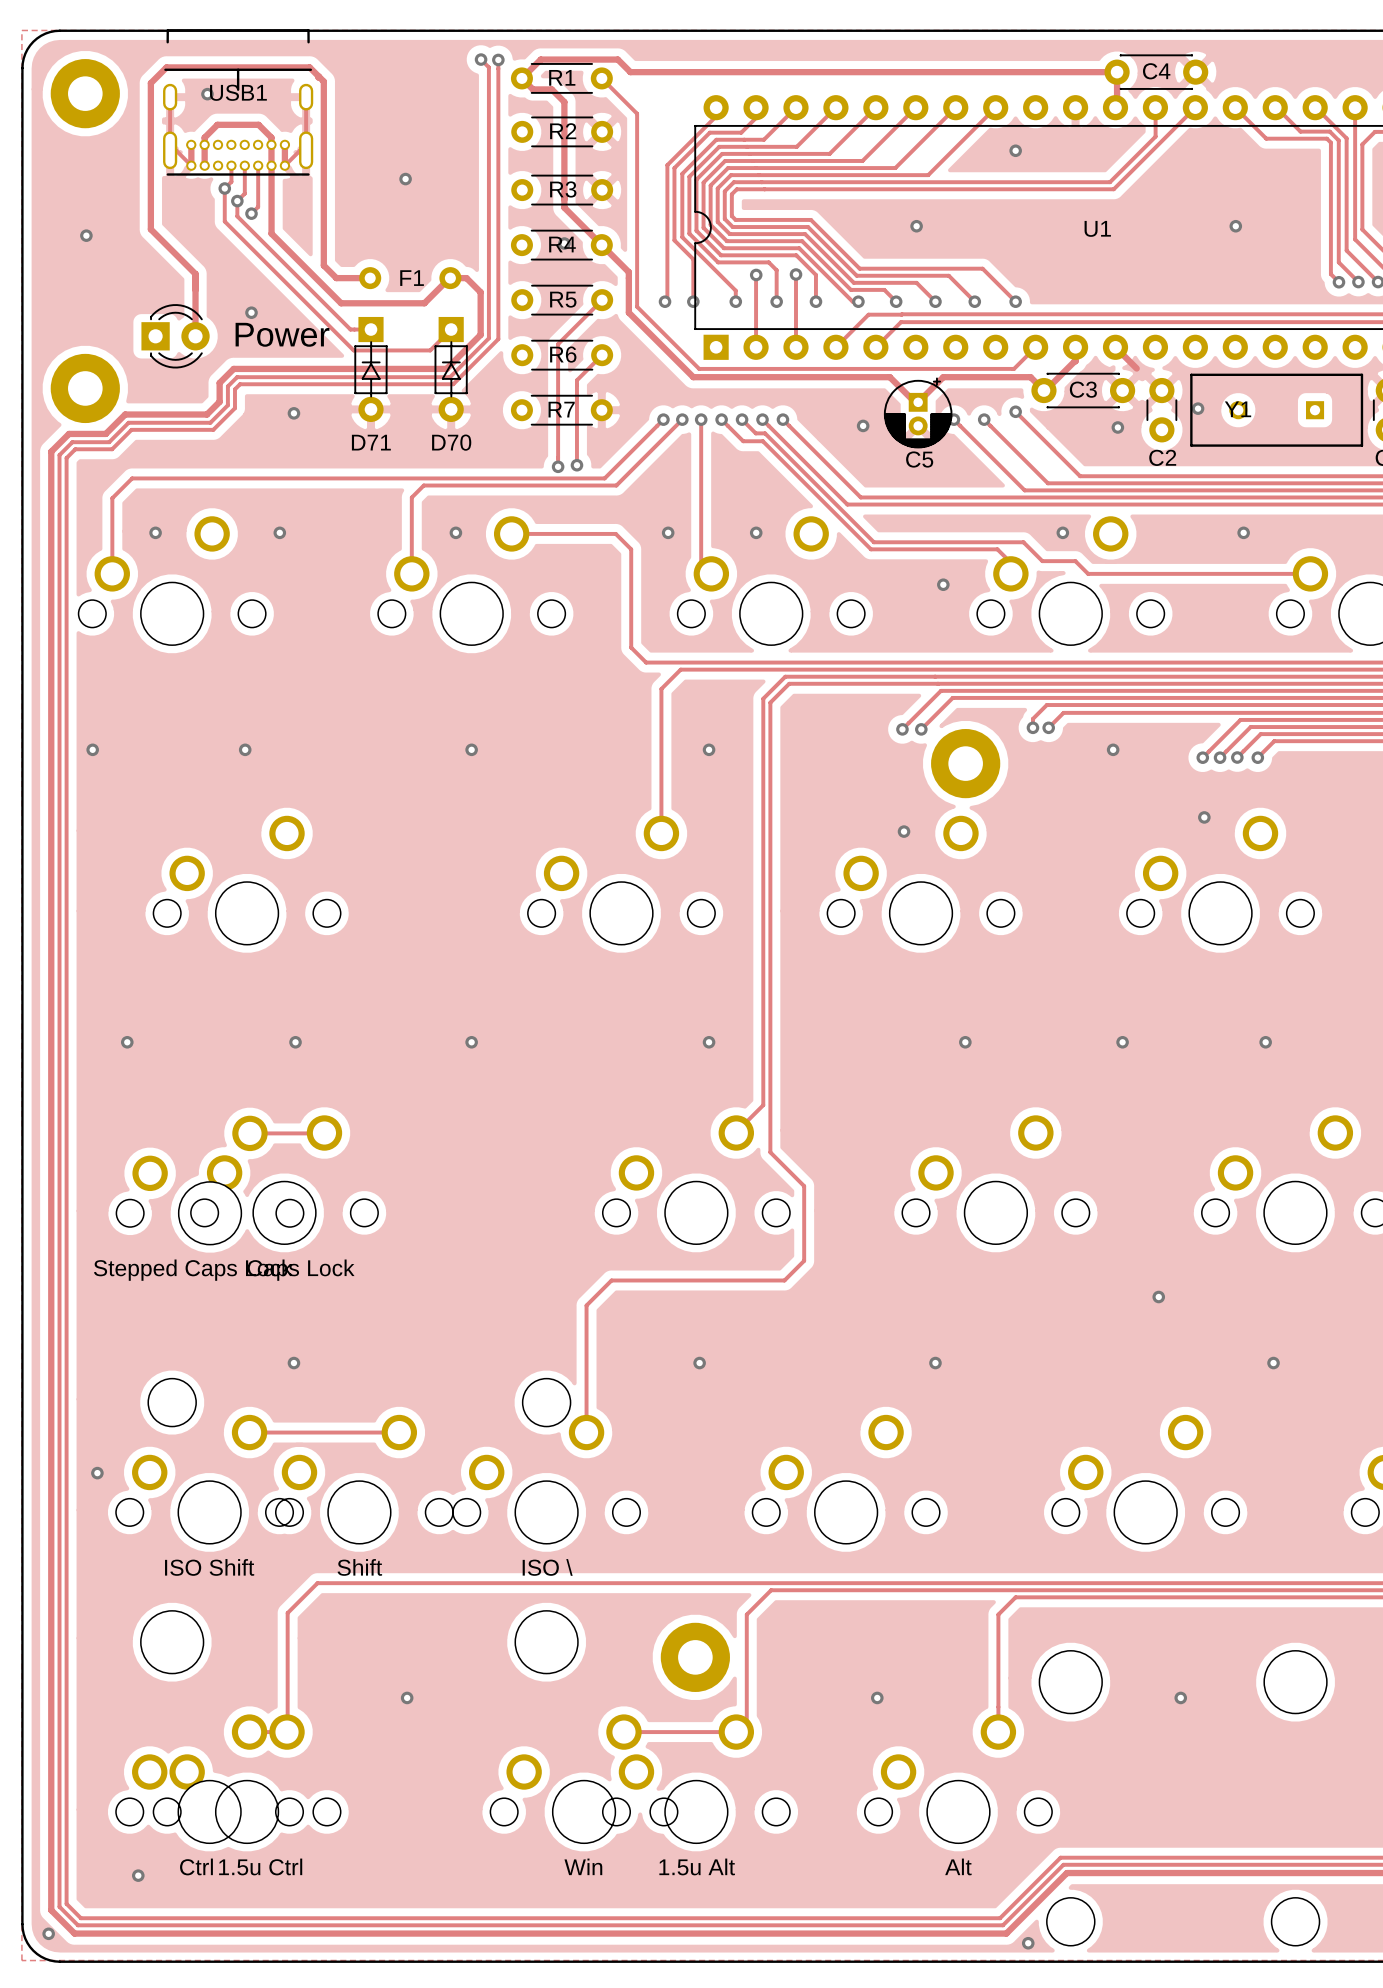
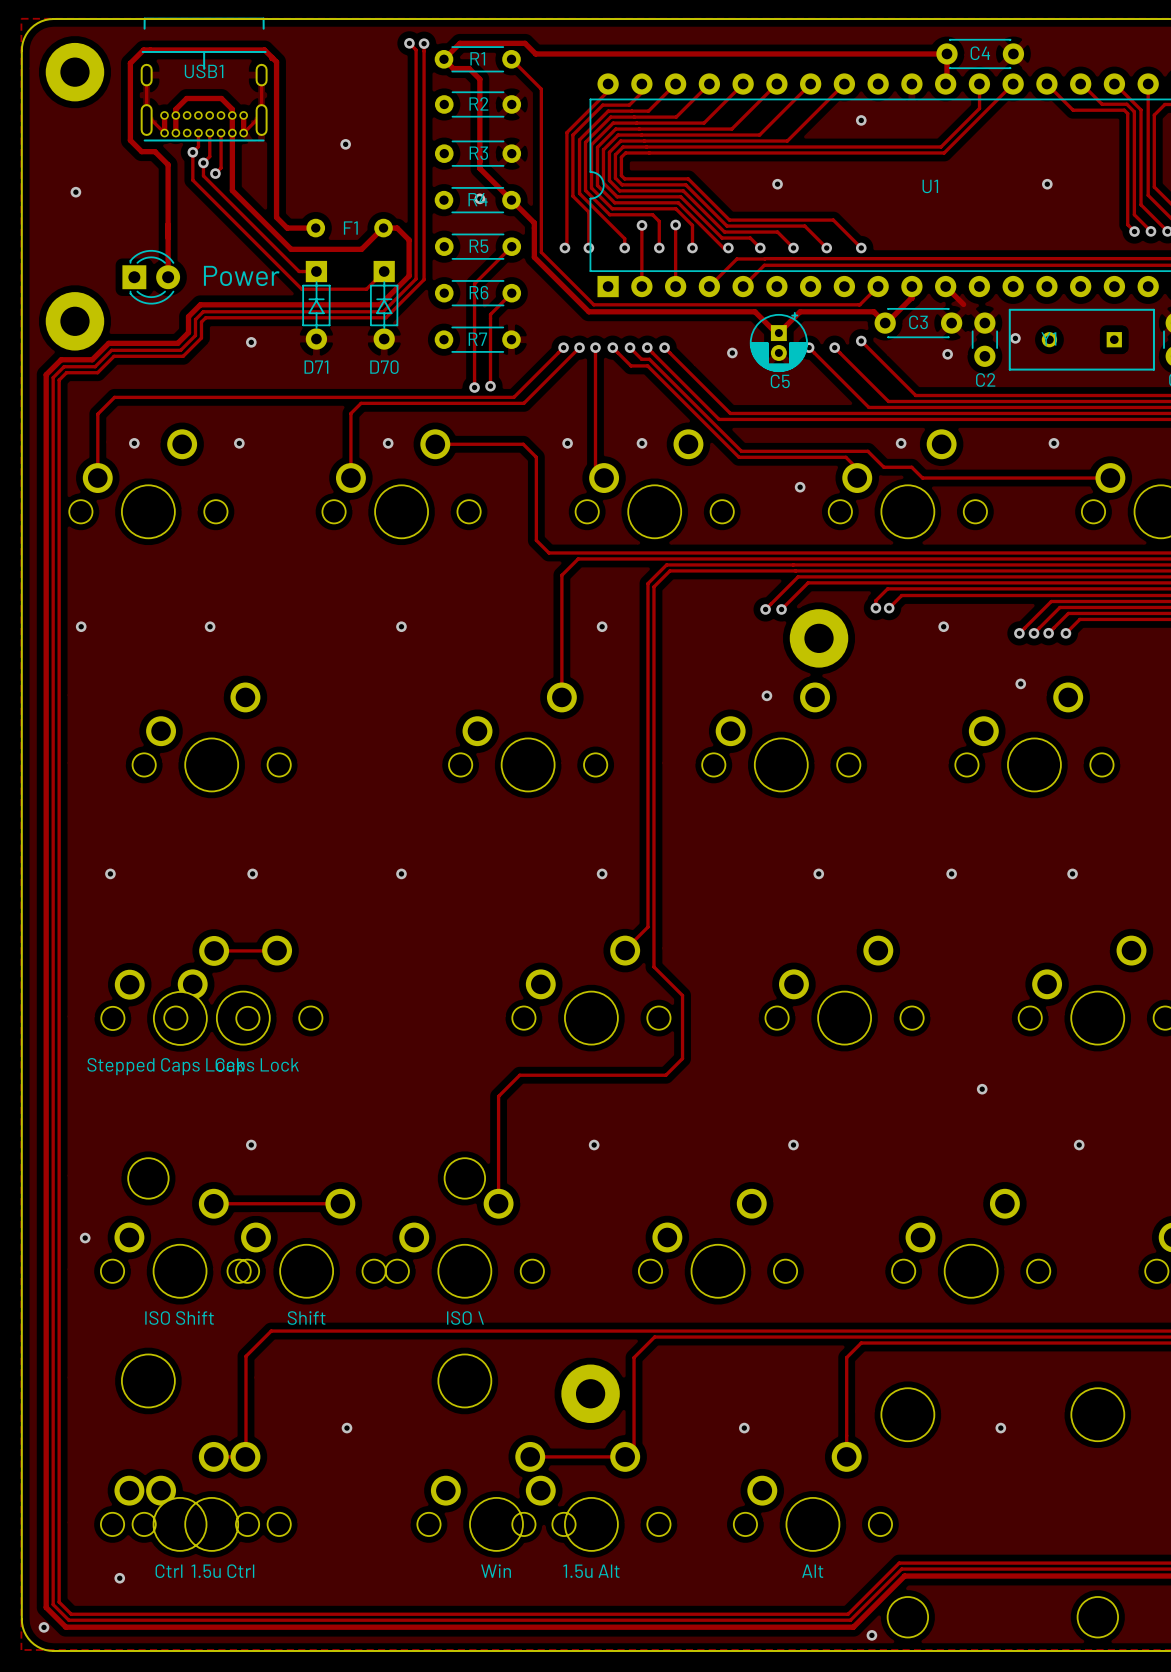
via: (207, 94) -> none
track: (150, 174) (150, 229) (195, 274) -> (130, 140) (141, 151) (154, 151) (168, 164) (168, 224)
via: (251, 312) -> none

